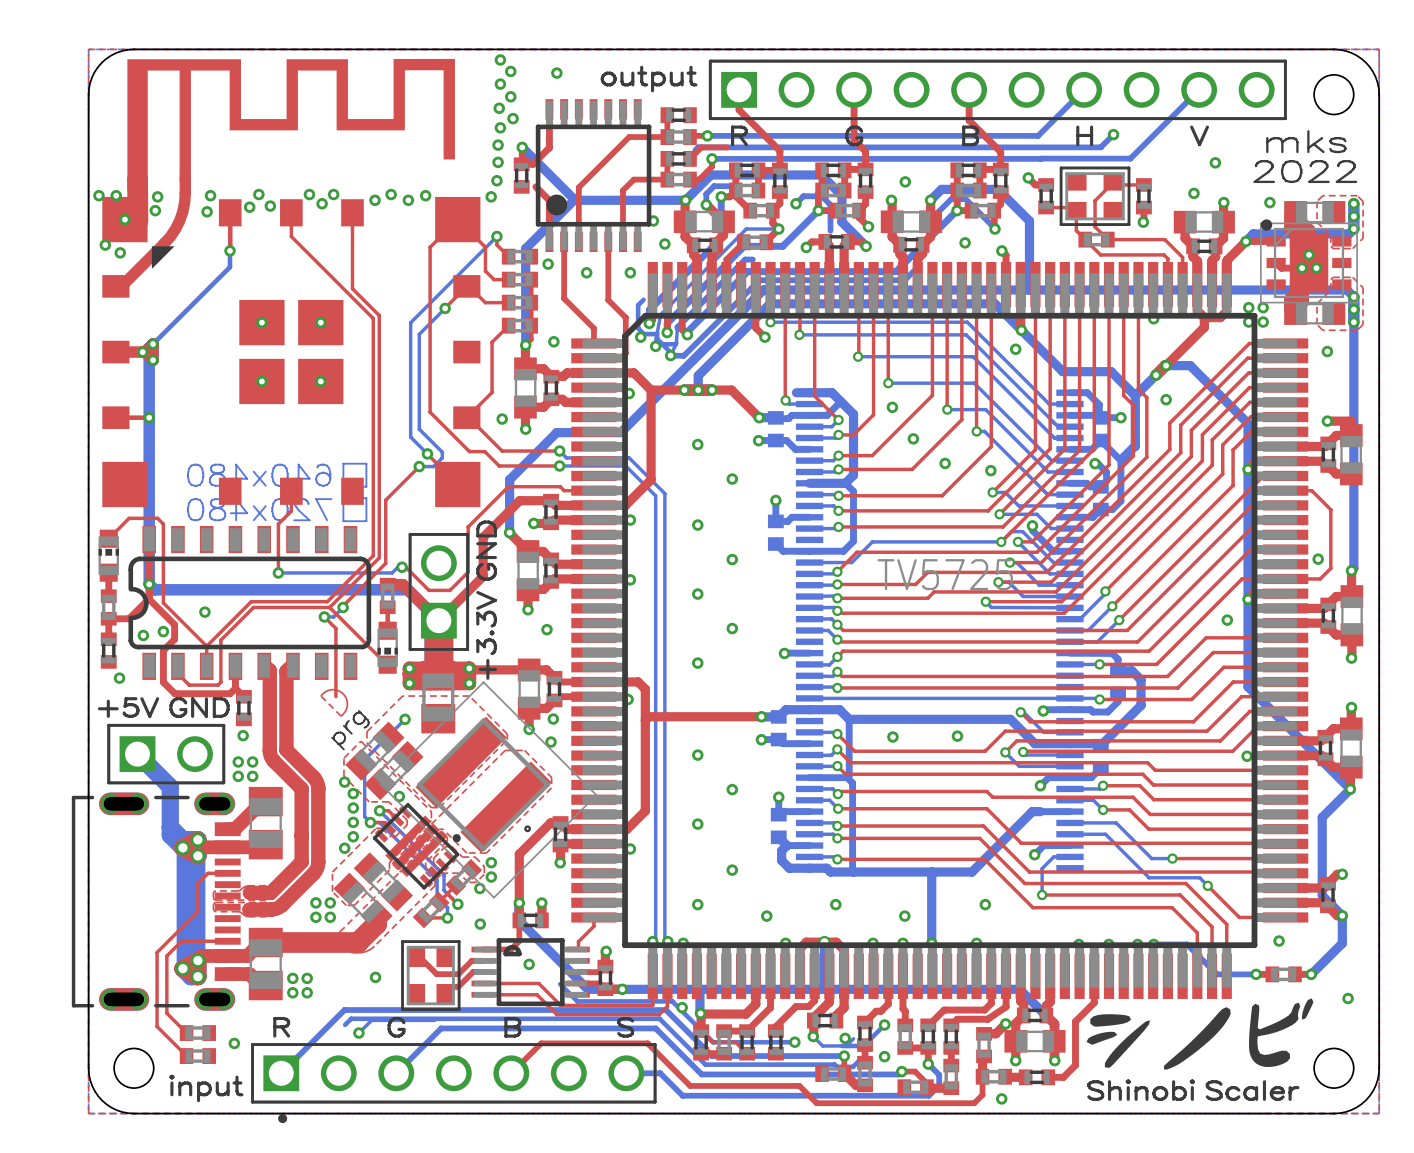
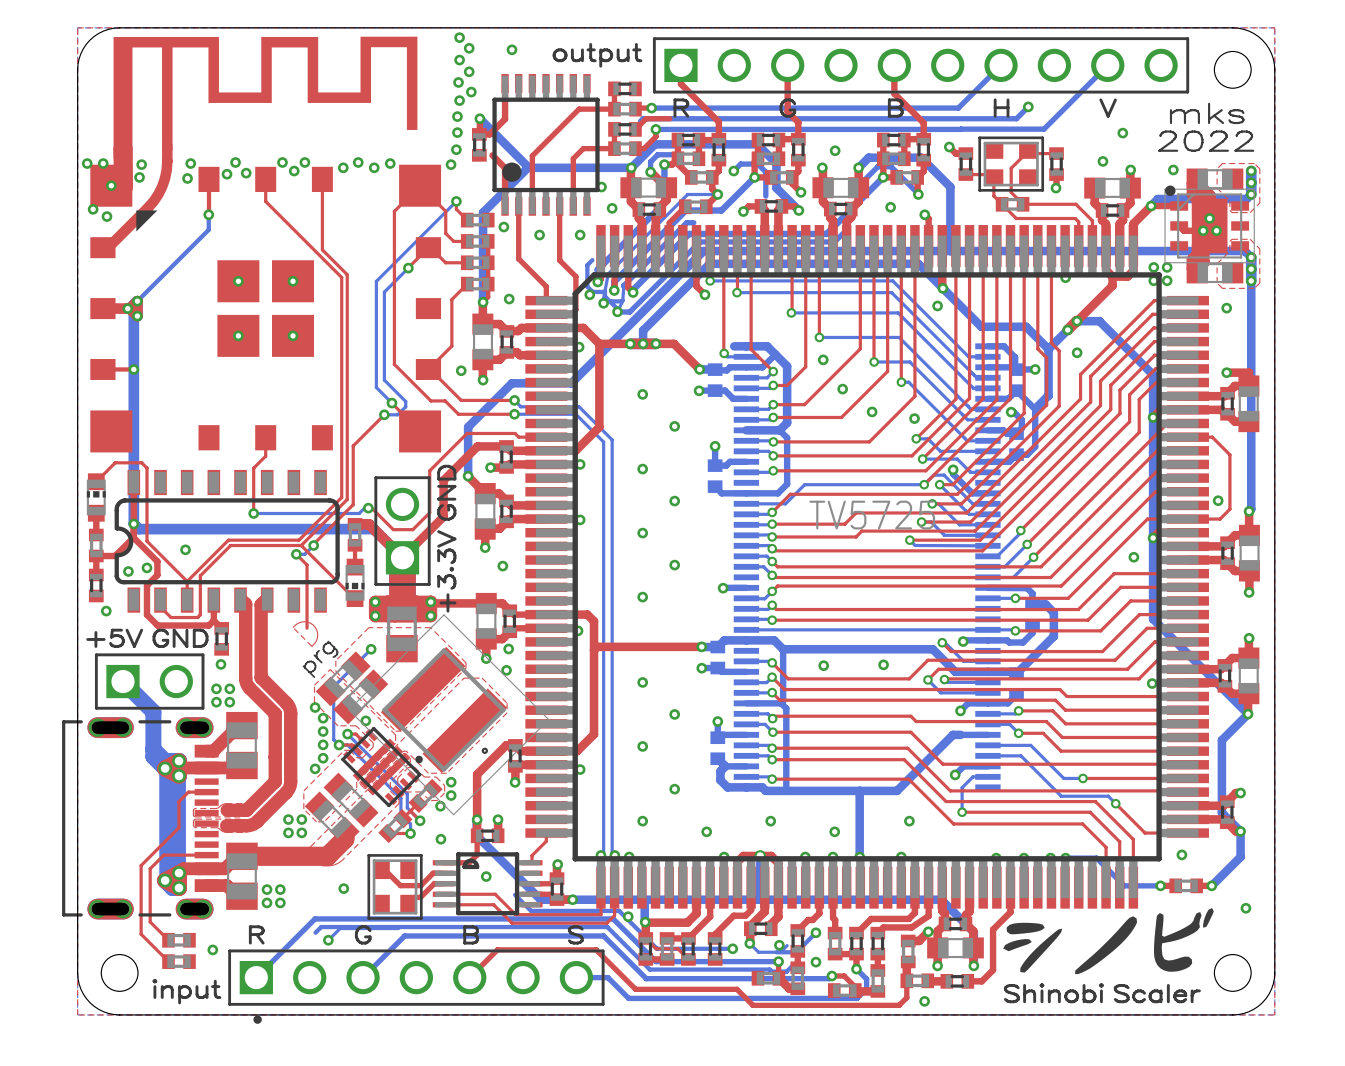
bottom track: (343, 463) (343, 486) (366, 486) (366, 463) (343, 463) -> none
bottom track: (194, 464) (200, 465) (203, 473) (202, 481) (196, 485) (191, 484) (187, 476) (189, 468) (194, 464) -> none
bottom track: (215, 464) (223, 465) (224, 469) (220, 472) (216, 473) (213, 474) (209, 481) (212, 484) (219, 485) (224, 483) (225, 478) (221, 474) (218, 473) (214, 472) (212, 471) (210, 467) (215, 464) -> none
bottom track: (278, 464) (284, 465) (287, 473) (286, 481) (281, 485) (275, 484) (272, 476) (273, 468) (278, 464) -> none
bottom track: (317, 467) (321, 464) (327, 465) (330, 478) -> none
bottom track: (253, 471) (265, 485) -> none
bottom track: (265, 471) (253, 485) -> none
bottom track: (230, 478) (247, 478) (236, 464) (236, 485) -> none
bottom track: (293, 478) (309, 478) (298, 464) (298, 485) -> none
bottom track: (330, 478) (329, 482) (323, 485) (319, 484) (316, 479) (317, 475) (322, 472) (327, 473) (330, 478) -> none
bottom track: (343, 498) (343, 521) (366, 521) (366, 498) (343, 498) -> none
bottom track: (194, 499) (200, 500) (203, 508) (202, 516) (196, 520) (191, 519) (187, 511) (189, 503) (194, 499) -> none
bottom track: (215, 499) (223, 500) (224, 504) (220, 507) (216, 508) (213, 509) (209, 516) (212, 519) (219, 520) (224, 518) (225, 513) (221, 509) (218, 508) (214, 507) (212, 506) (210, 502) (215, 499) -> none
bottom track: (278, 499) (284, 500) (287, 508) (286, 516) (281, 520) (275, 519) (272, 511) (273, 503) (278, 499) -> none
bottom track: (331, 499) (316, 499) (327, 520) -> none
bottom track: (308, 504) (306, 500) (299, 499) (295, 505) (309, 520) (294, 520) -> none
bottom track: (253, 506) (265, 520) -> none
bottom track: (265, 506) (253, 520) -> none
bottom track: (230, 513) (247, 513) (236, 499) (236, 520) -> none

